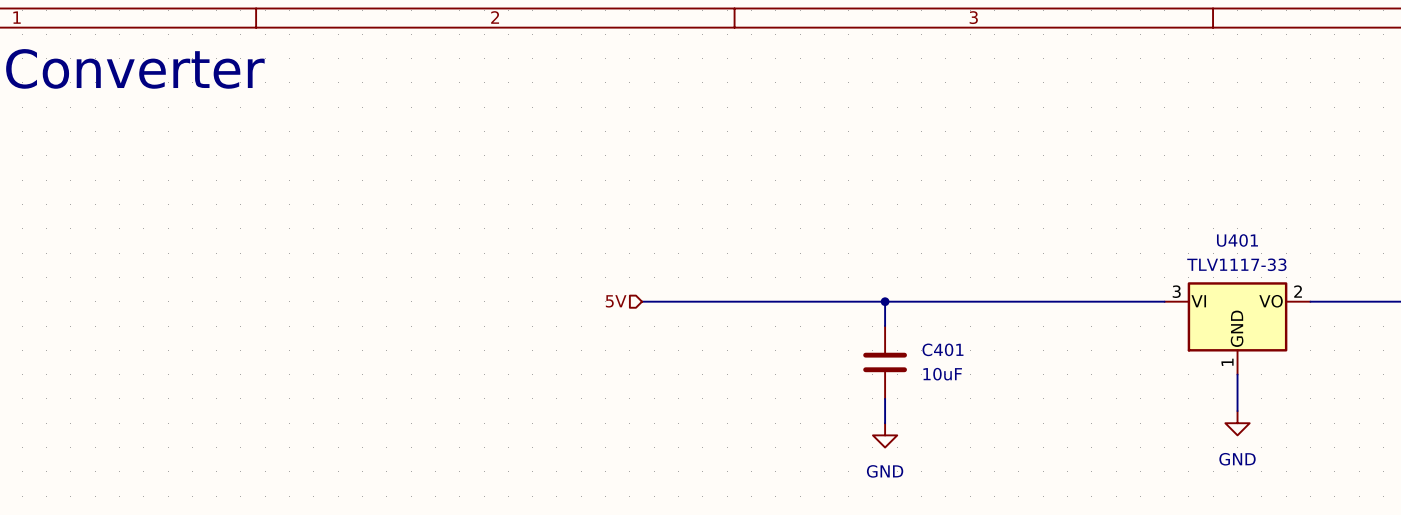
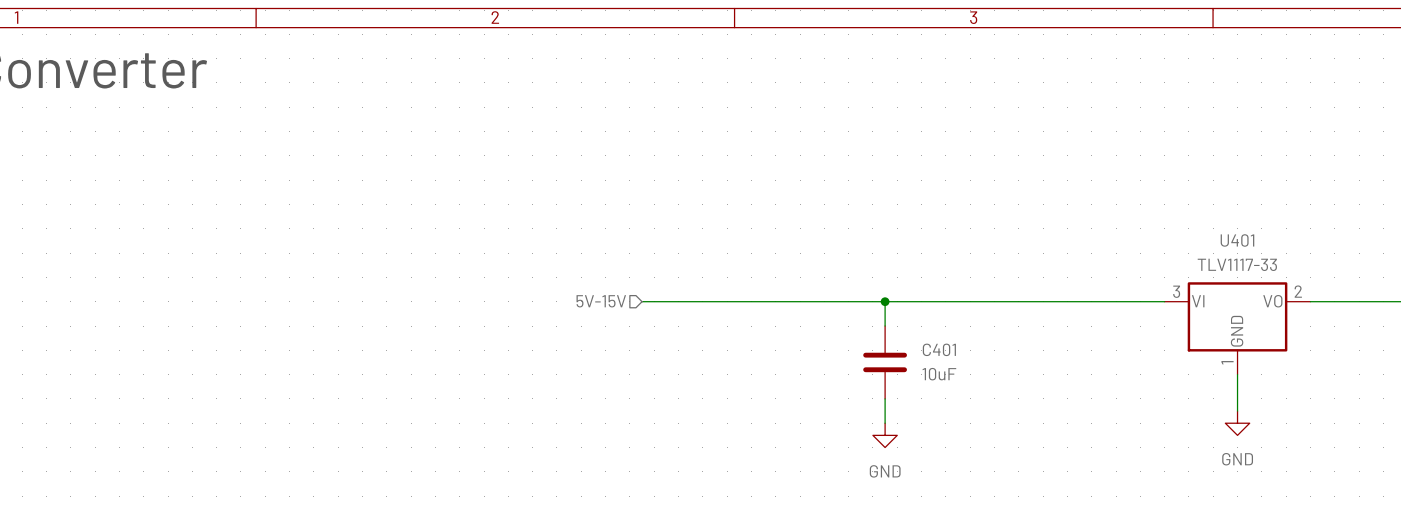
hierarchical label: 5V (616, 301) -> 5V-15V (601, 301)

